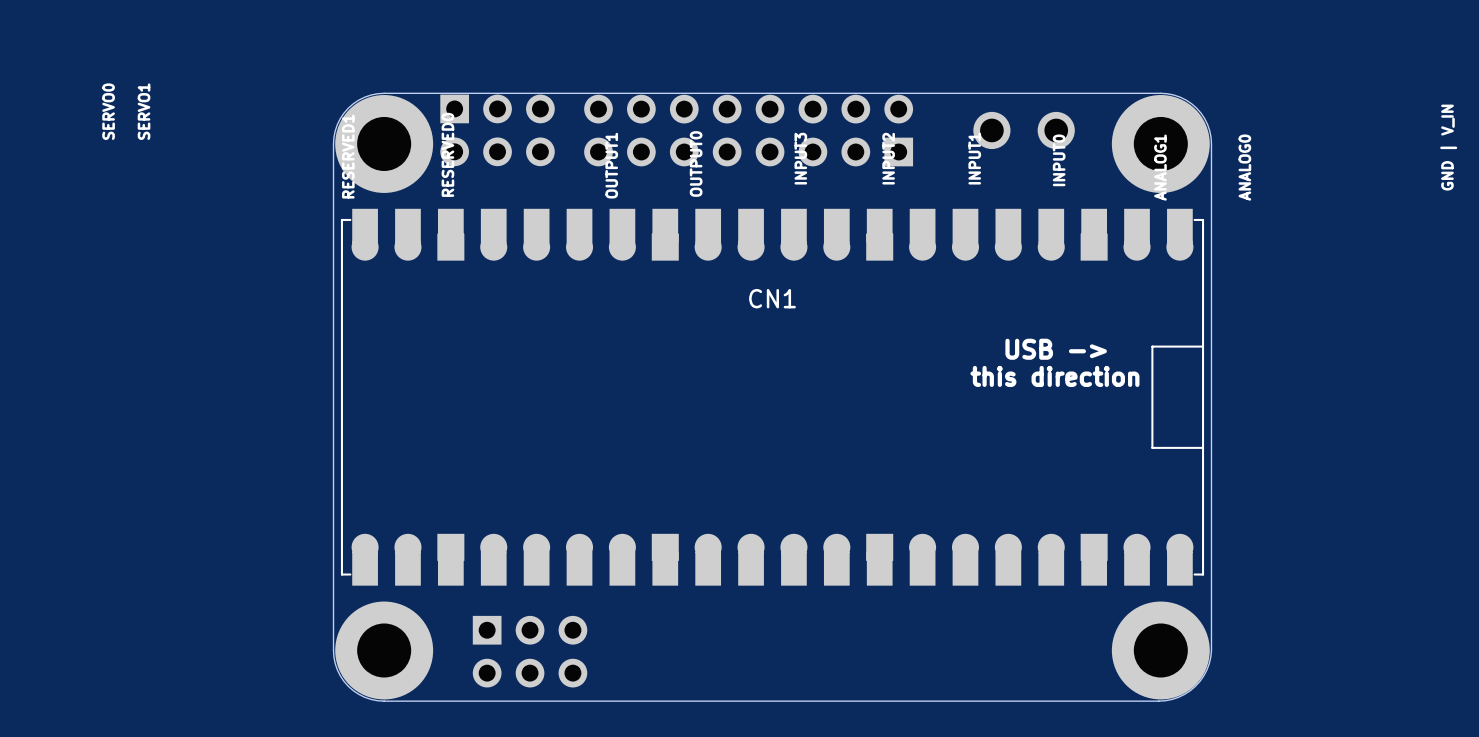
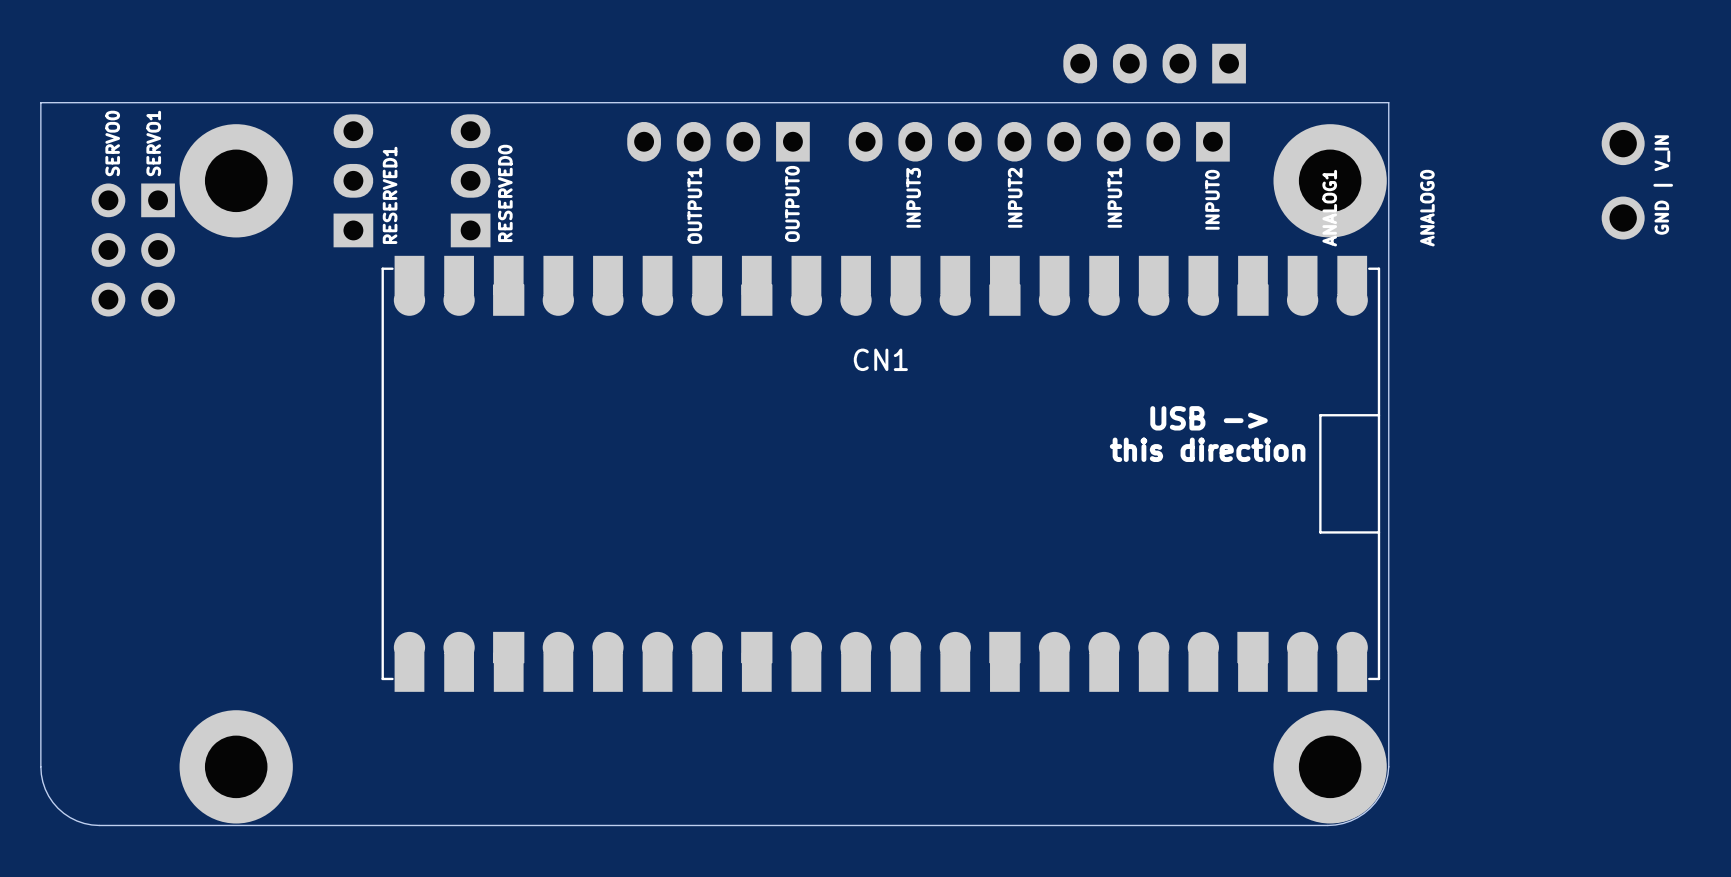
part: none -> (1154, 63)
part: none -> (718, 141)
part: none -> (1039, 141)
part: (497, 130) -> none
part: (748, 130) -> none
part rotation: 0° (1024, 130) -> 90° clockwise (1623, 180)
part position: (1024, 130) -> (1623, 180)
part: none -> (353, 180)
part position: (384, 143) -> (236, 180)
part: none -> (470, 180)
board edge: (1211, 143) (1207, 124) (1196, 108) (1180, 97) (1160, 93) (384, 93) (364, 97) (353, 103) (340, 118) (335, 130) (333, 143) (333, 650) (337, 669) (348, 686) (364, 697) (384, 701) -> (1388, 180) (1388, 102) (40, 102) (40, 766) (42, 782) (48, 796) (58, 808) (70, 817) (91, 824) (431, 825)
part: none -> (133, 249)
part position: (384, 650) -> (236, 766)
part: (530, 651) -> none

